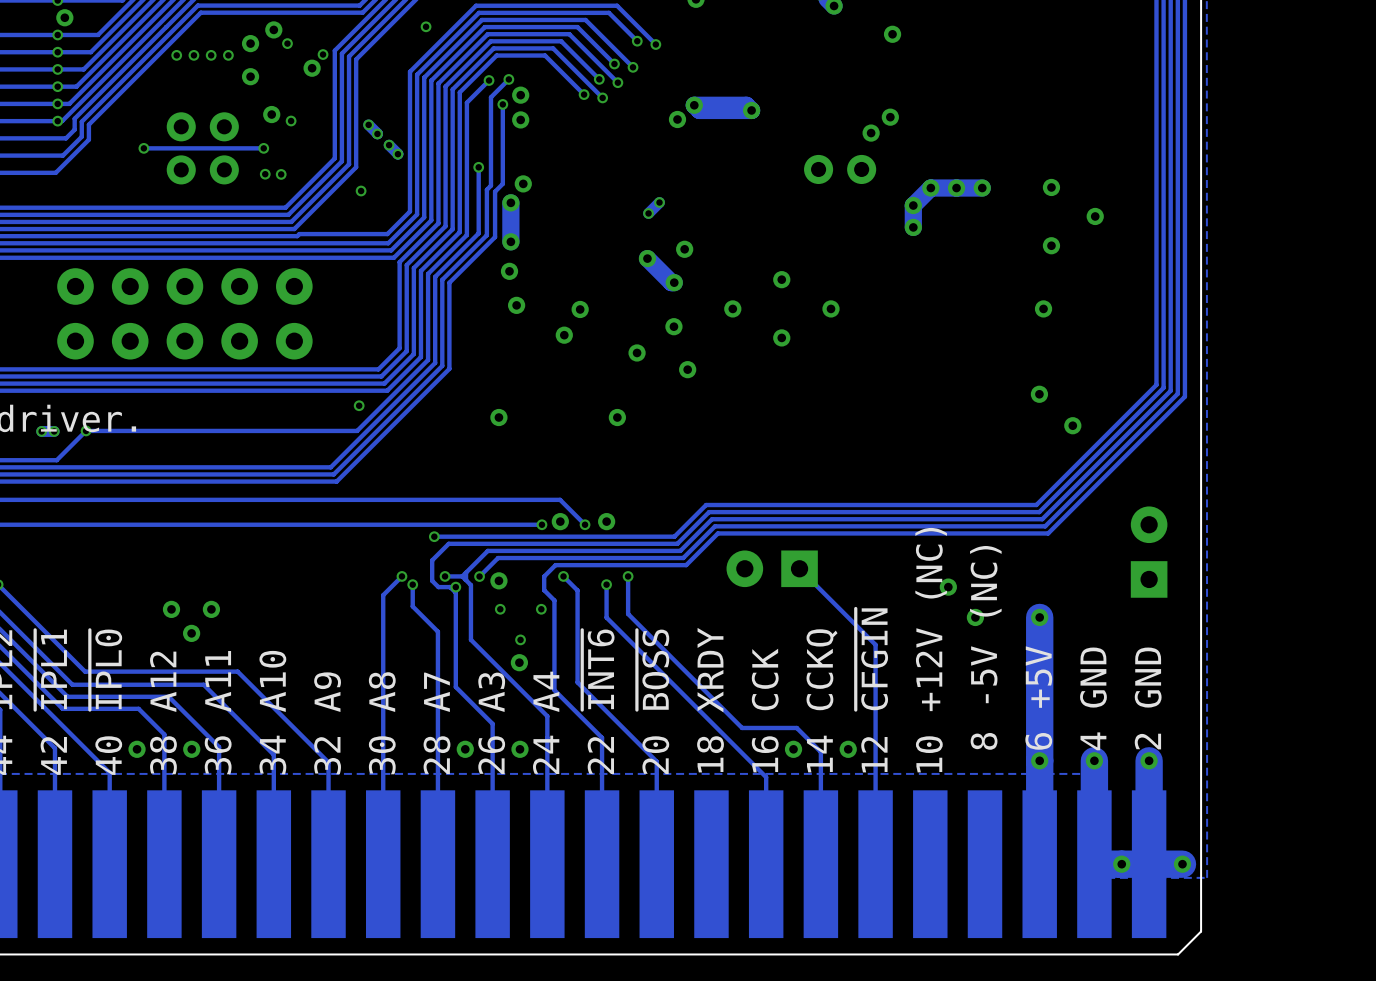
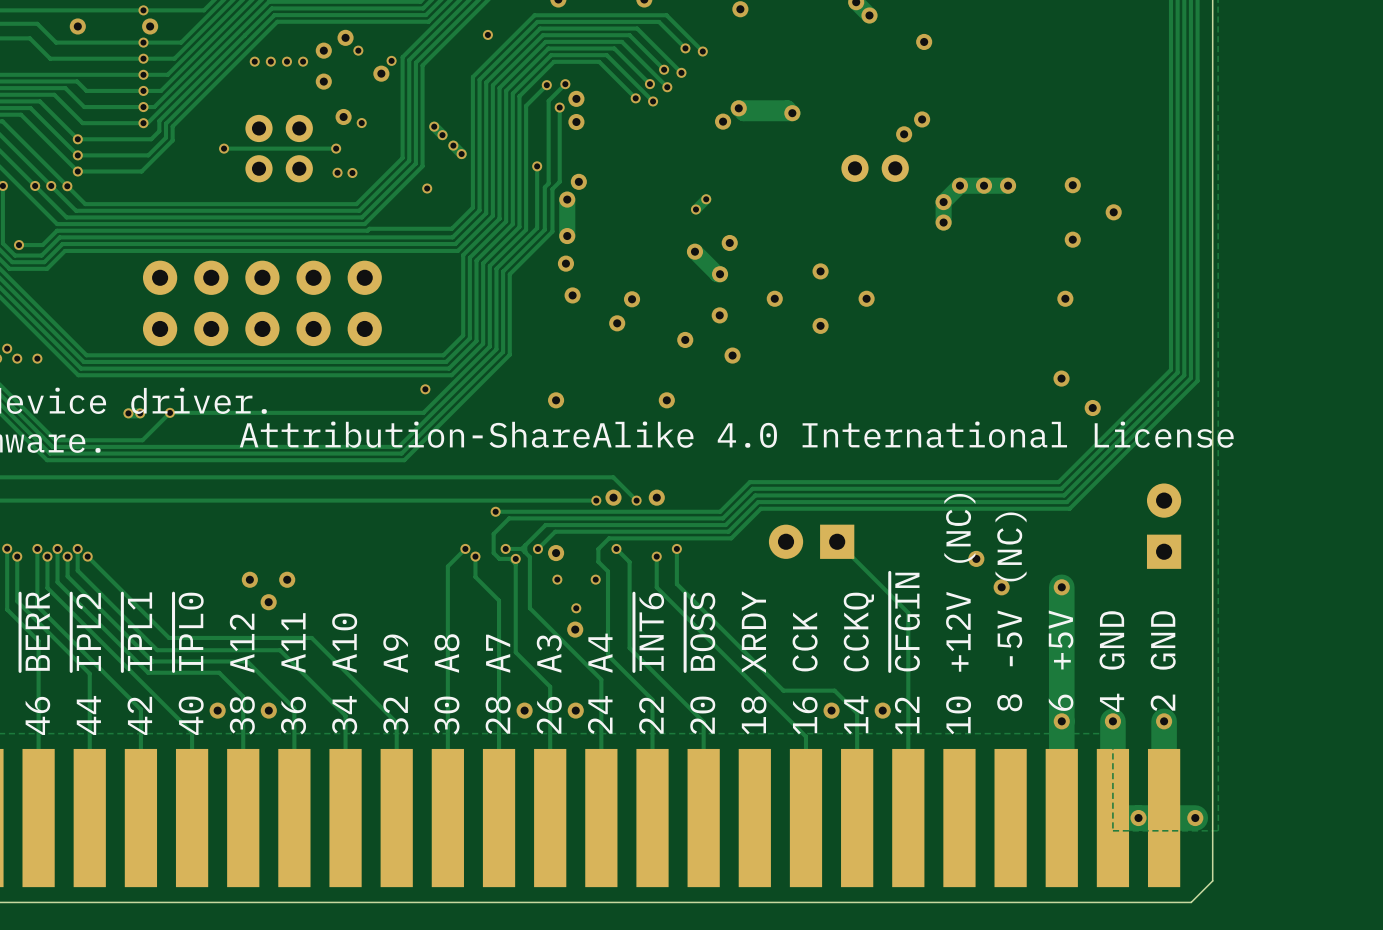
text: none -> Attribution-ShareAlike 4.0 International License (736, 434)

